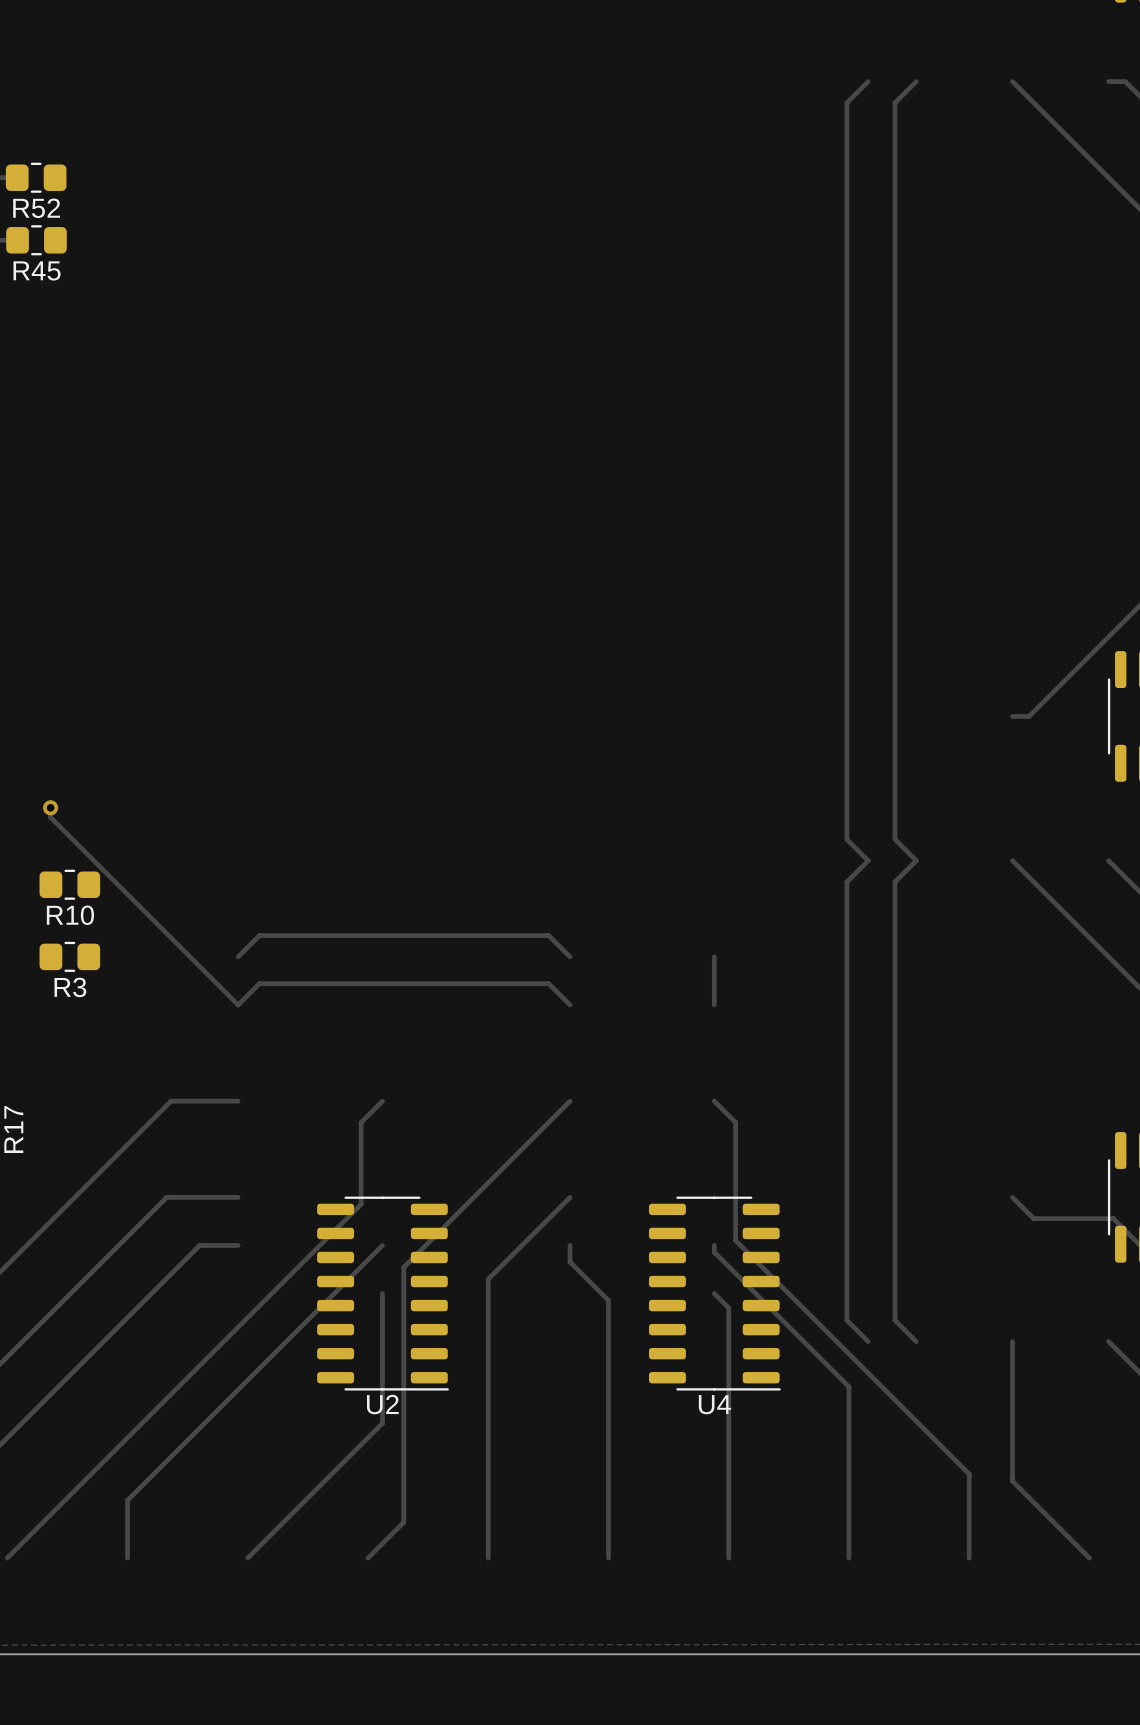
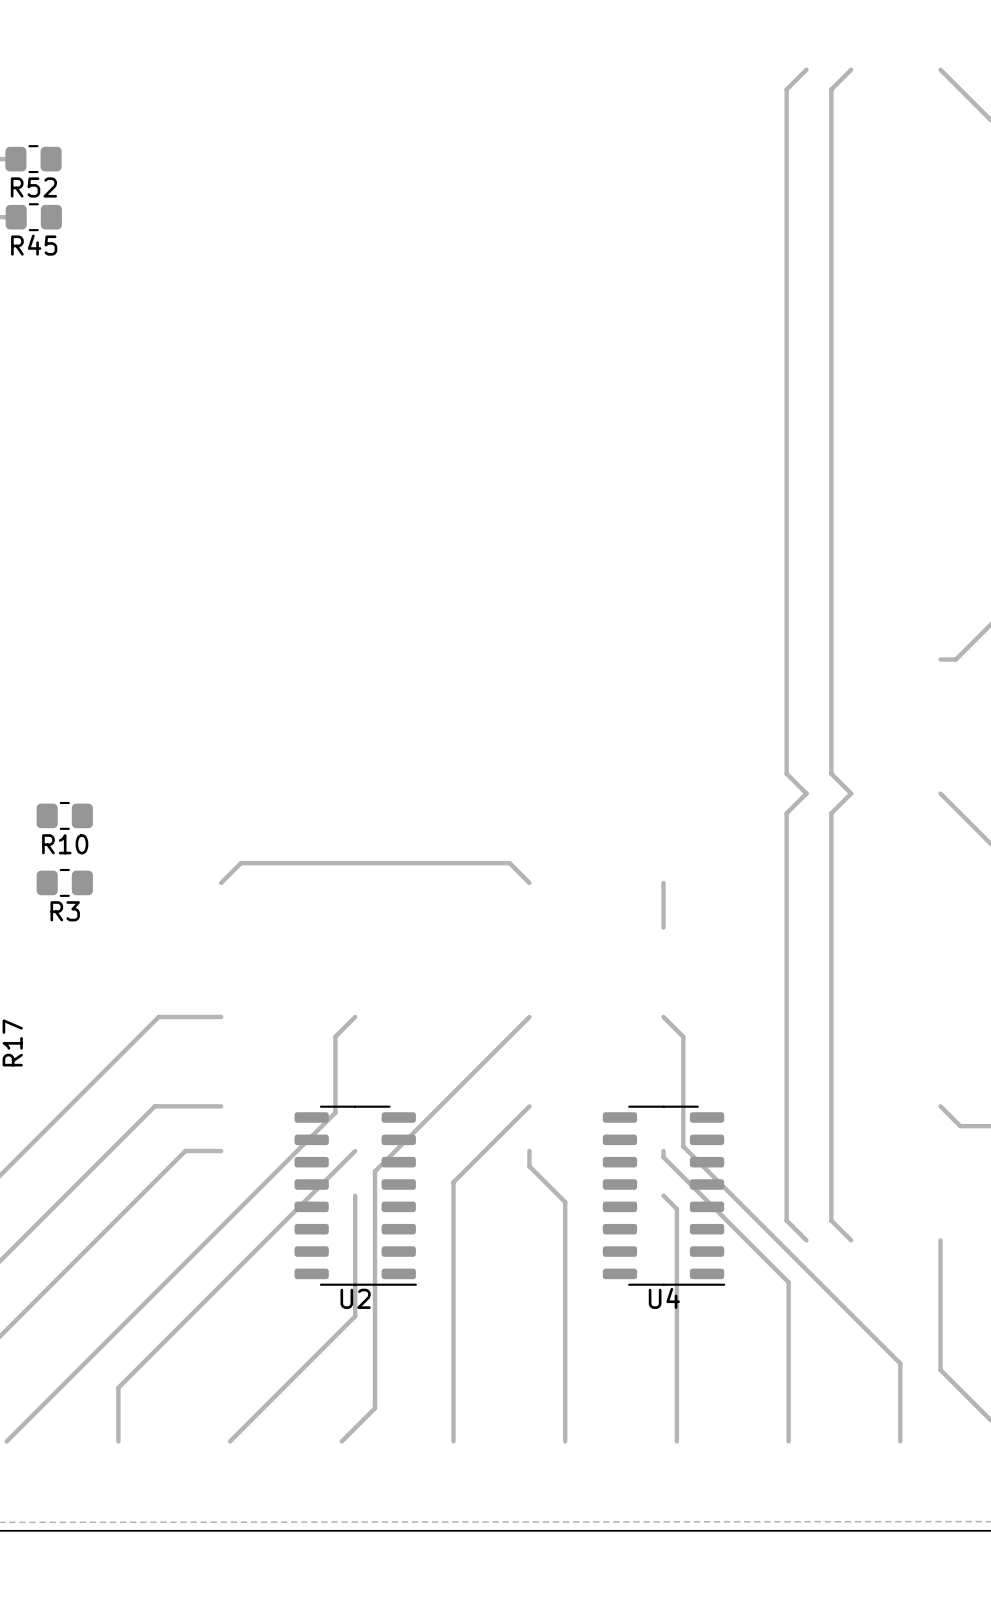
track: (50, 807) (50, 817) (238, 1004) (259, 983) (548, 983) (570, 1004) -> none
via: (50, 807) -> none

